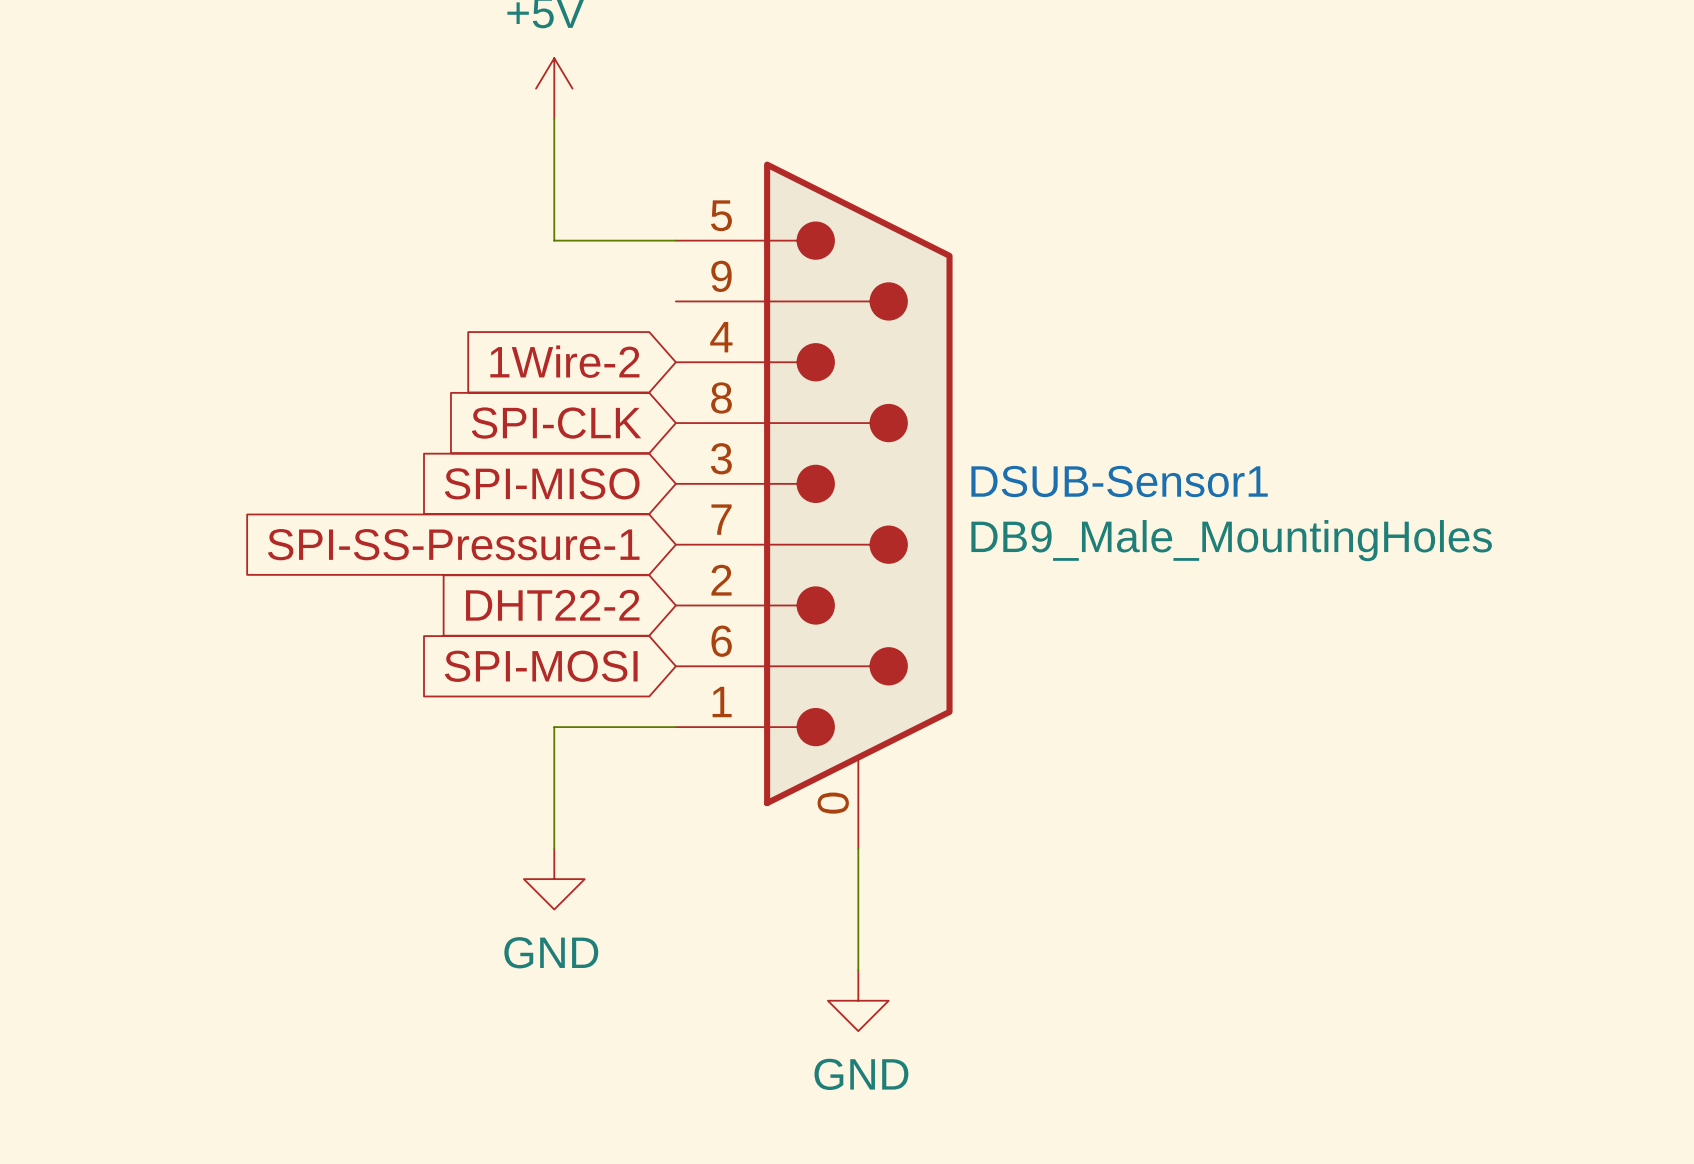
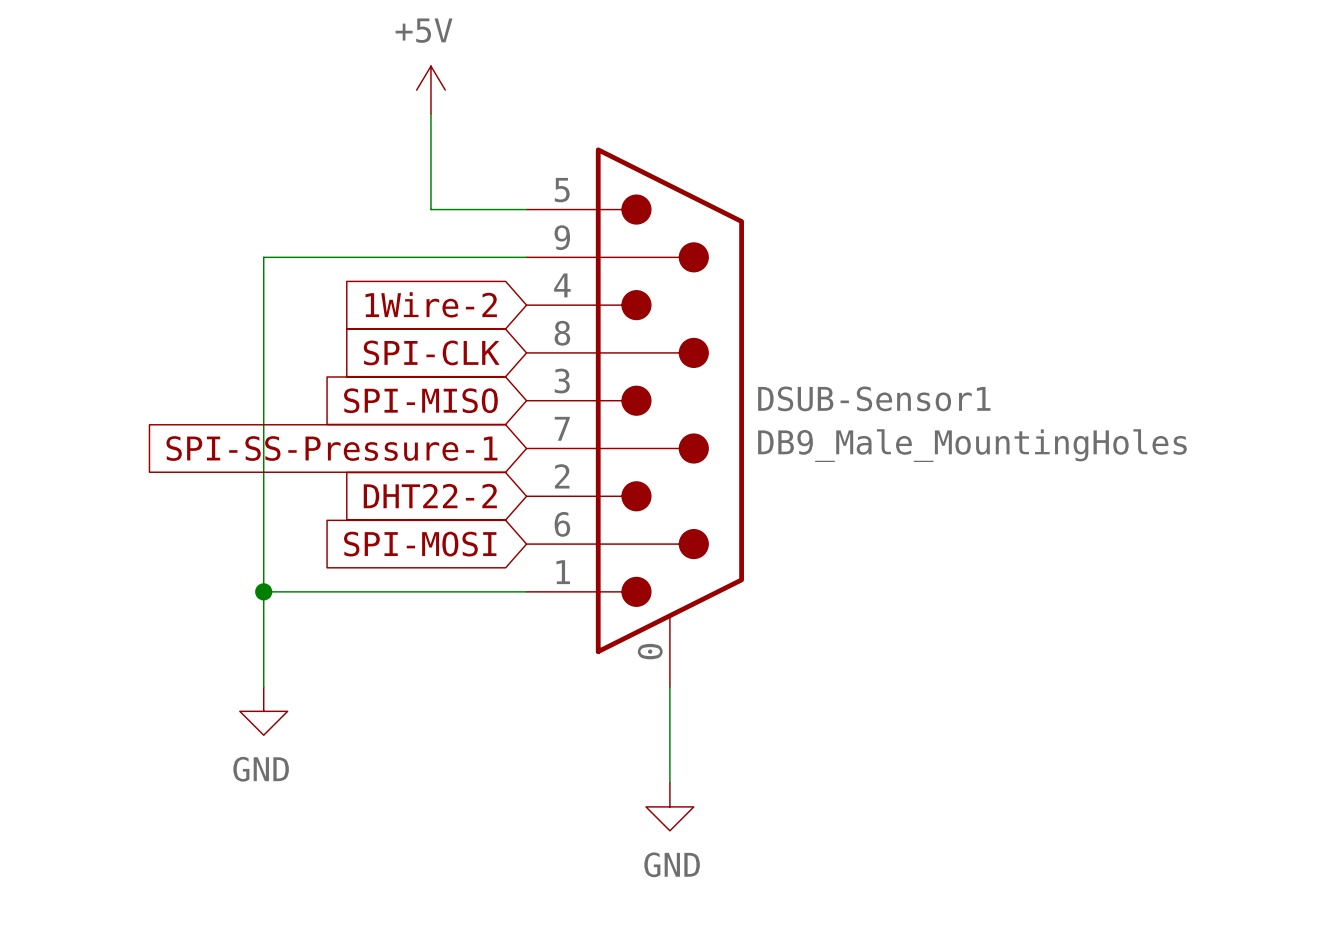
wire: none -> (526, 257) (263, 257) (263, 687)
junction: none -> (263, 591)
wire: (554, 727) (554, 848) -> (430, 591) (263, 591)
power symbol position: GND (554, 879) -> GND (263, 711)

